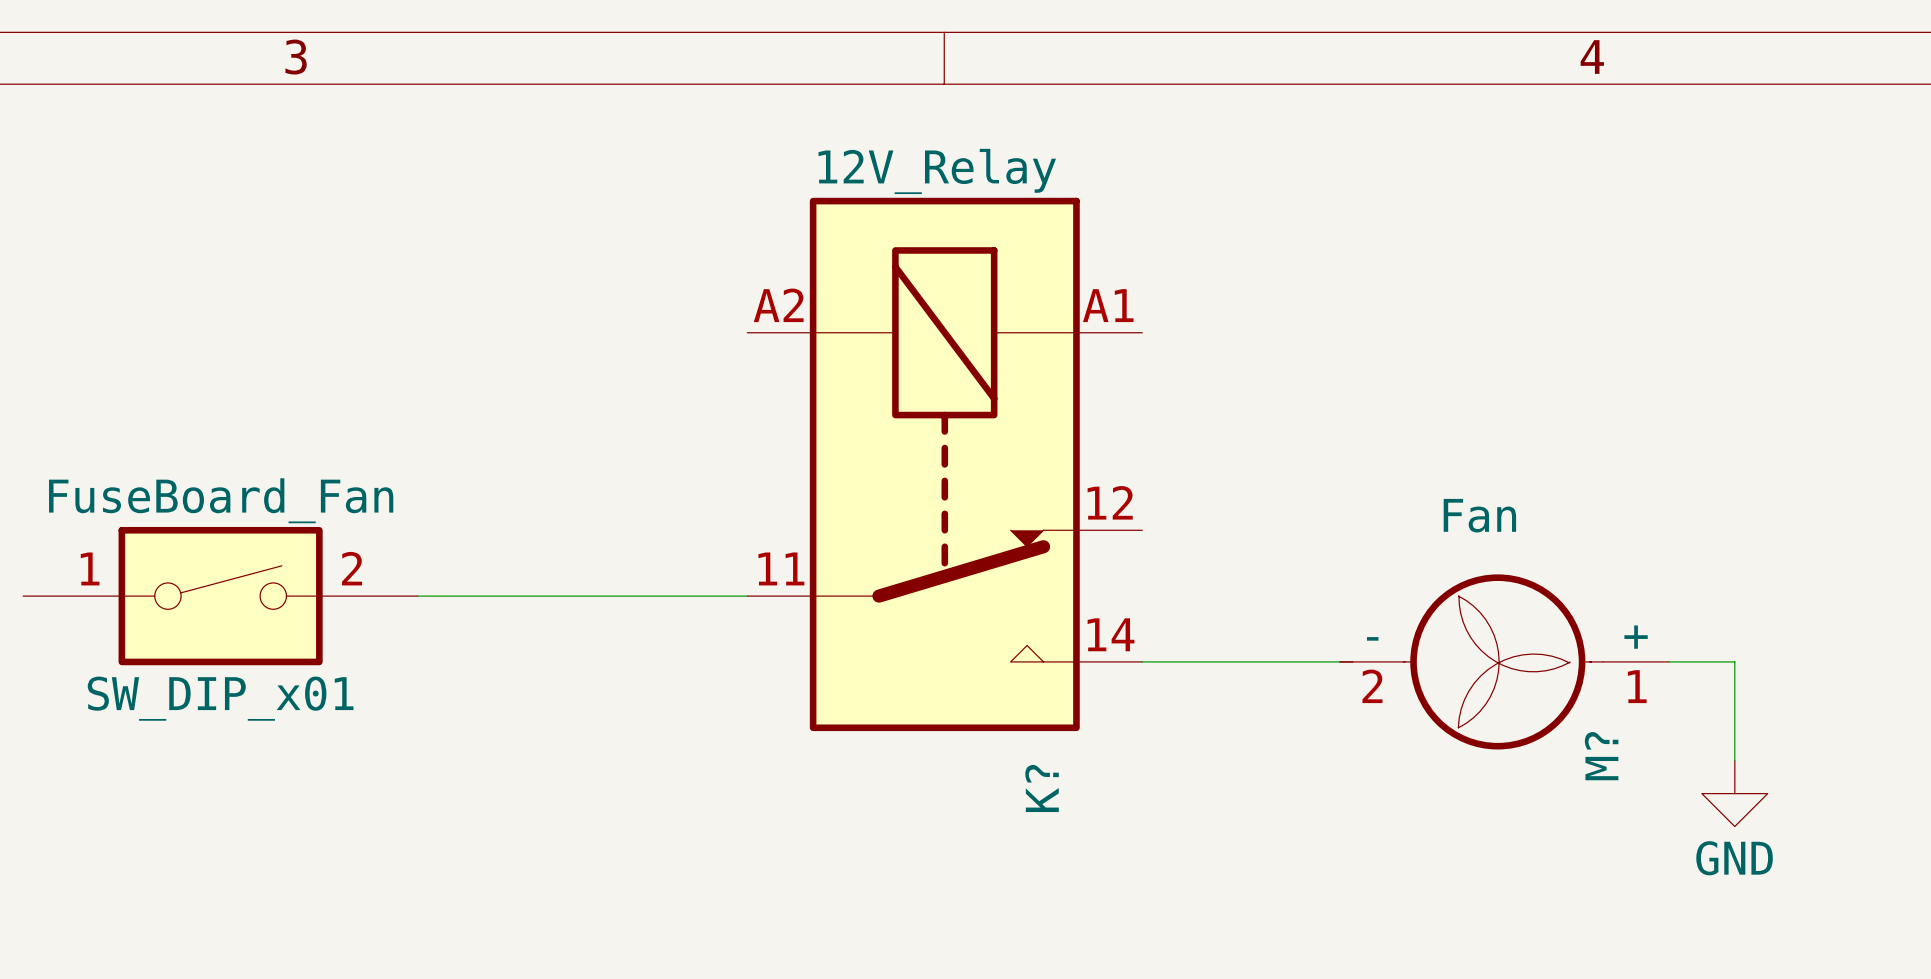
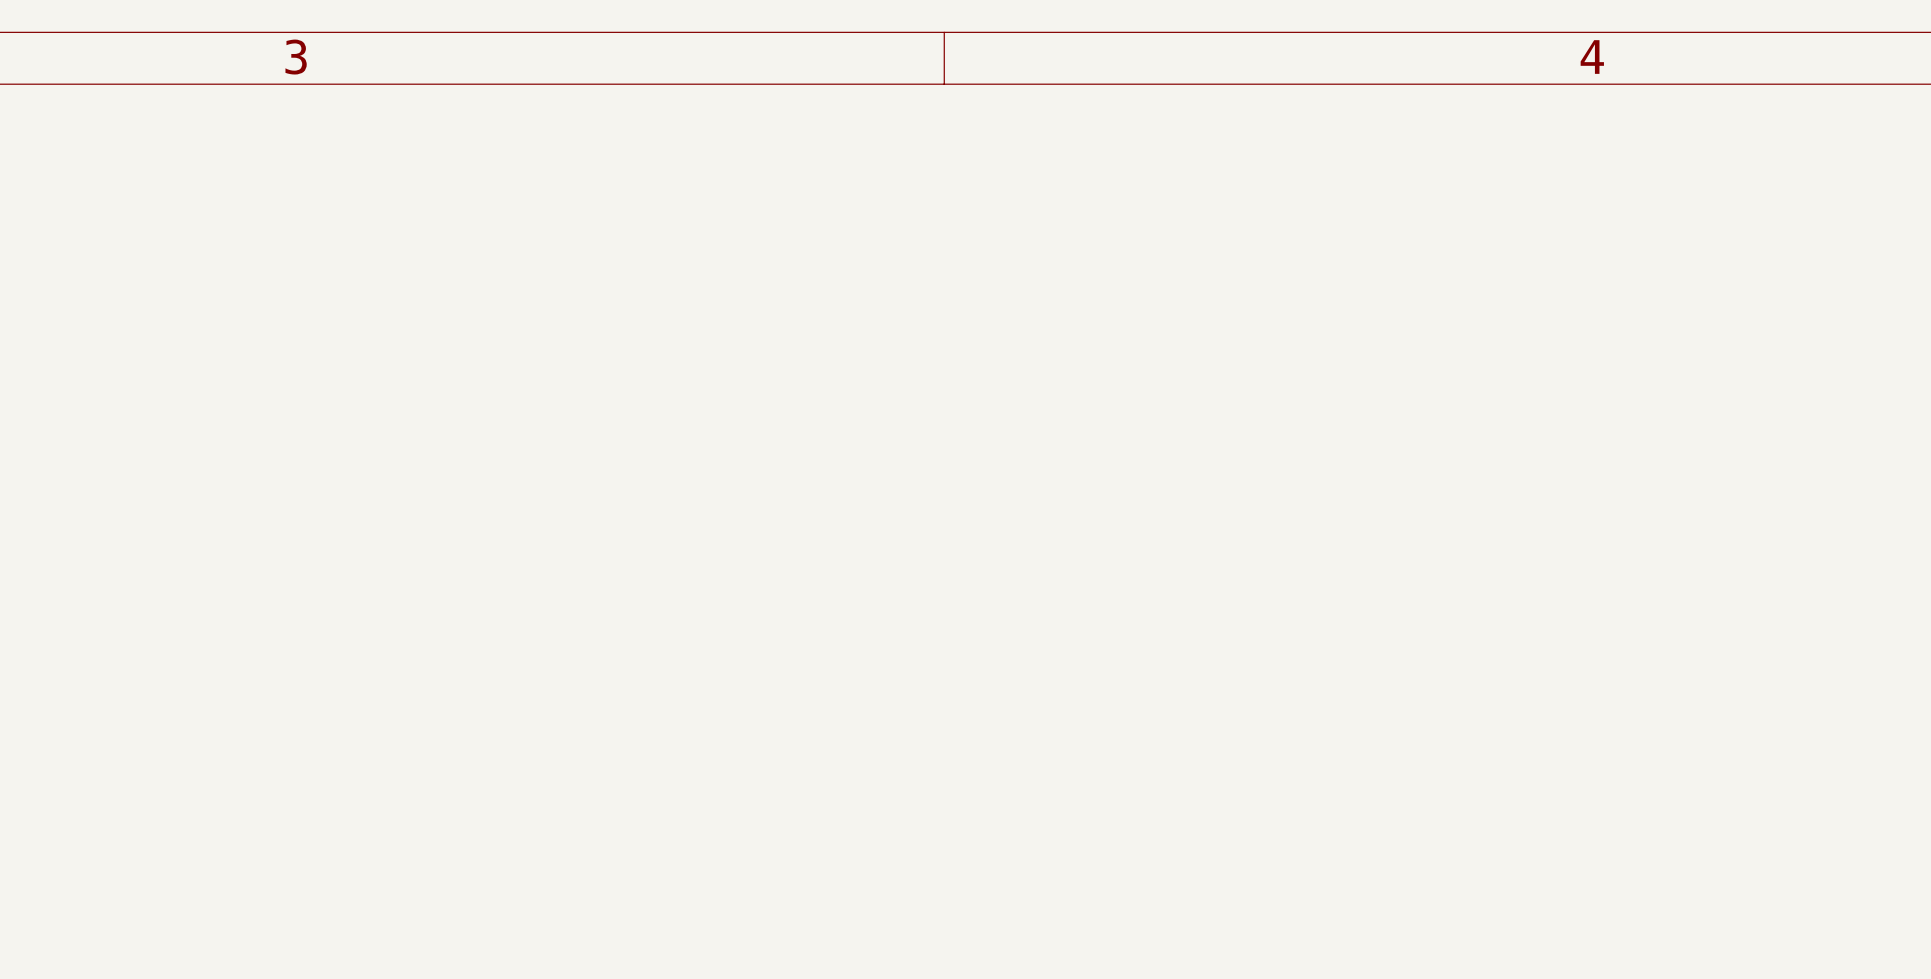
K?: 12V_Relay (944, 464) -> none
FuseBoard_Fan: SW_DIP_x01 (220, 596) -> none
wire: (418, 596) (747, 596) -> none
wire: (1142, 661) (1339, 661) -> none
M?: Fan (1504, 661) -> none
wire: (1668, 661) (1734, 661) (1734, 760) -> none
power symbol: GND (1734, 793) -> none

